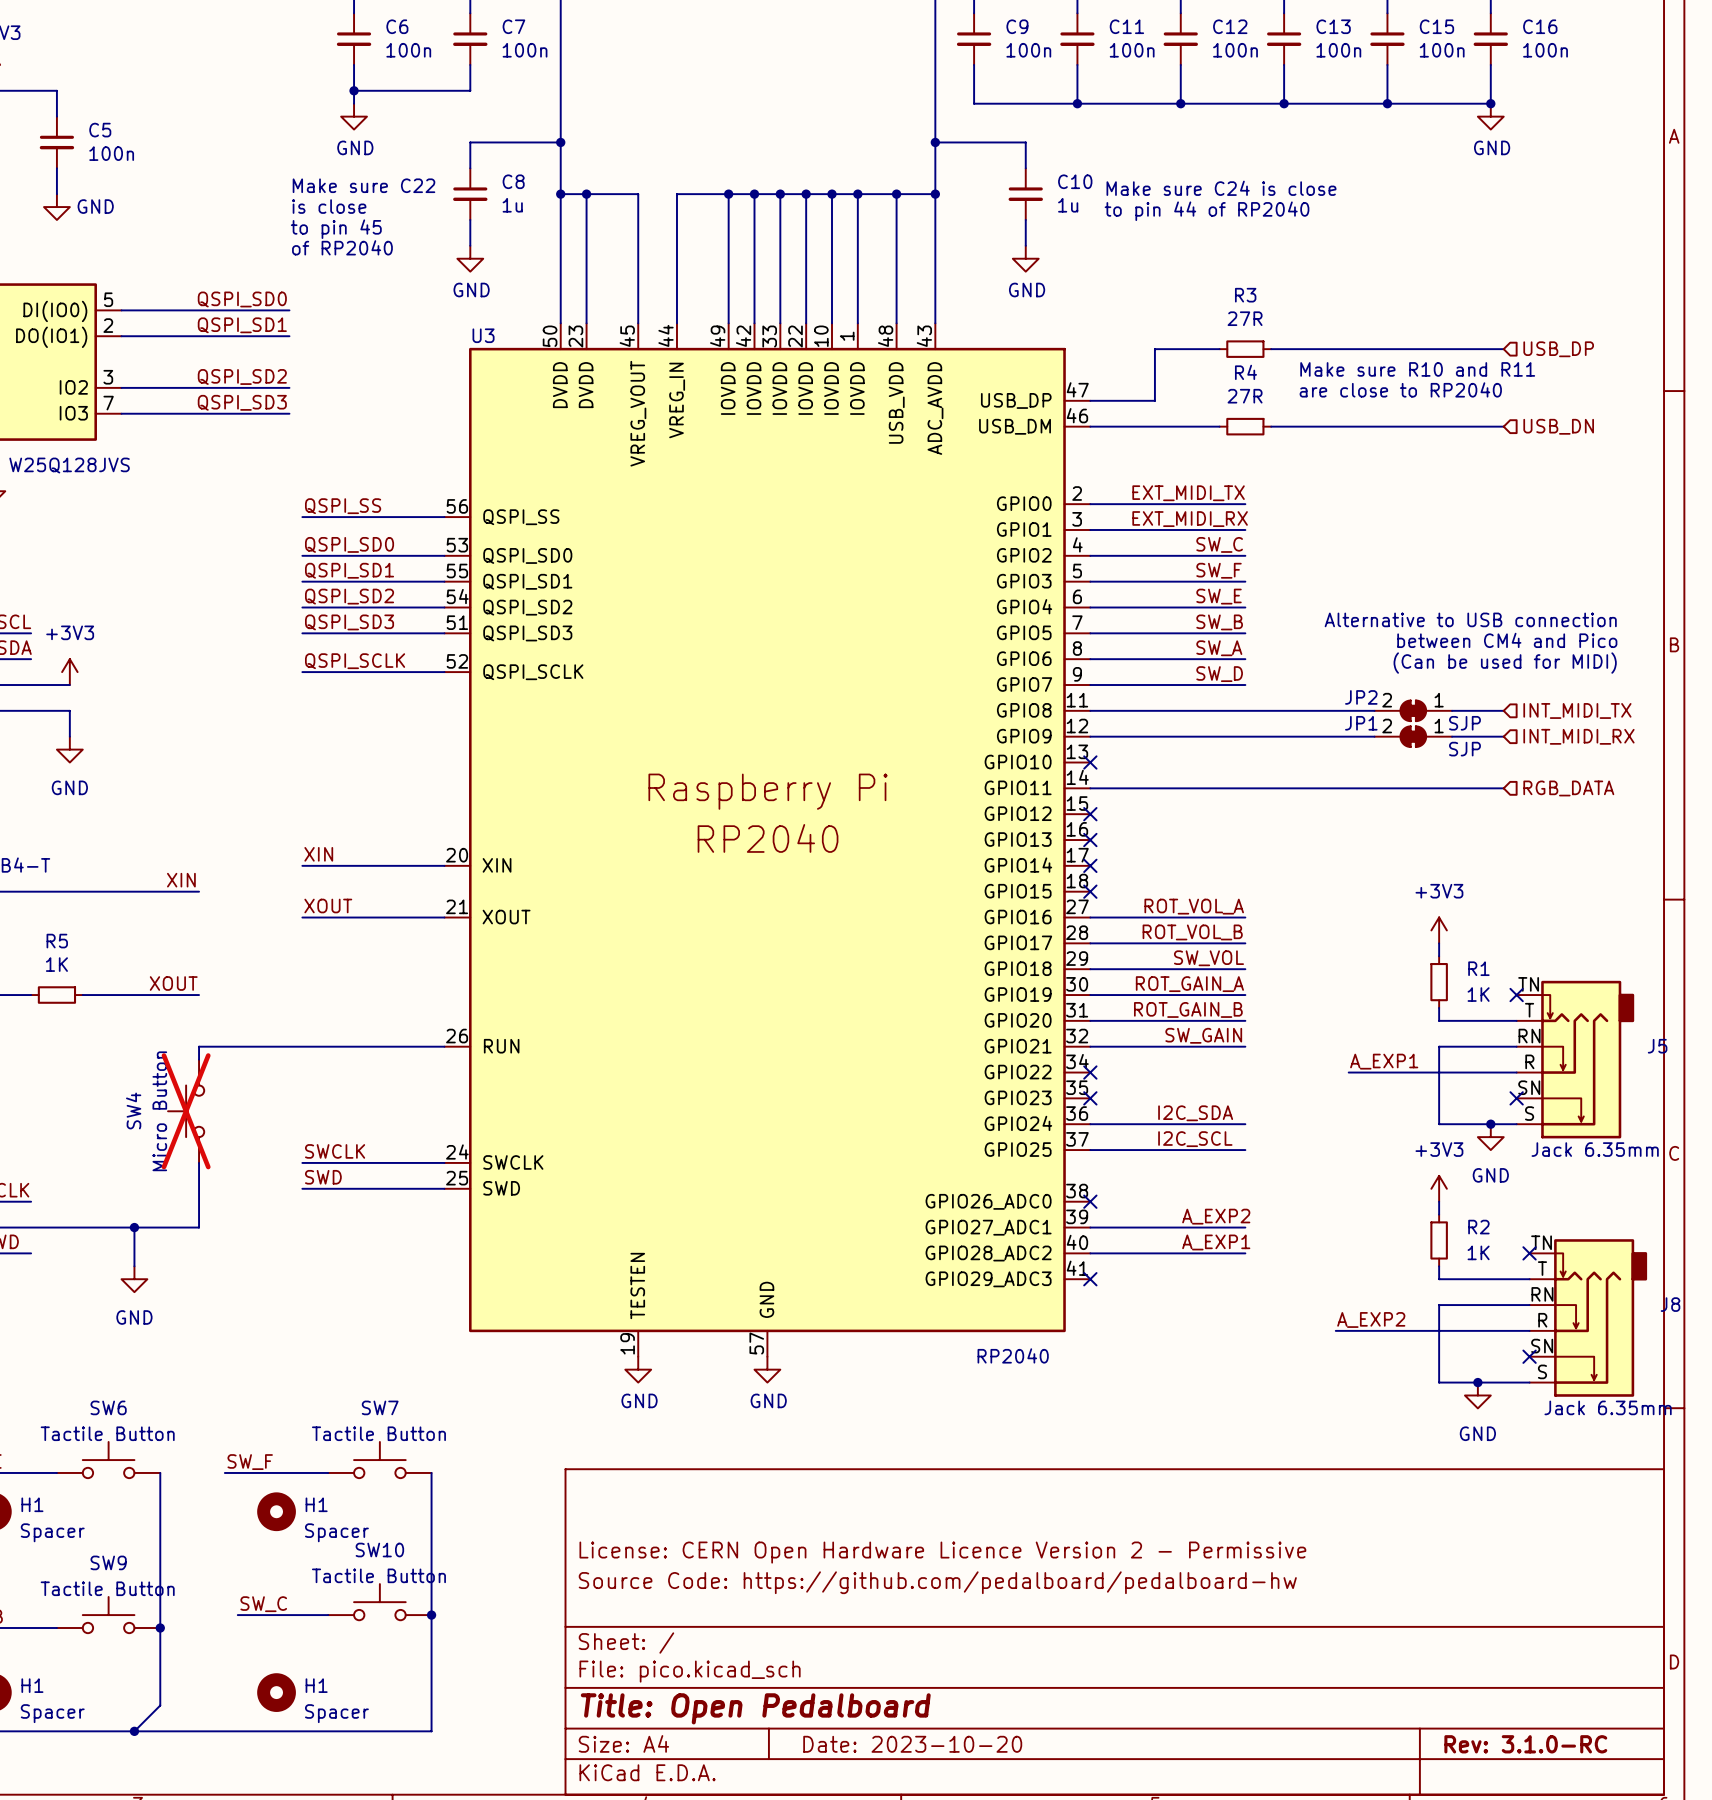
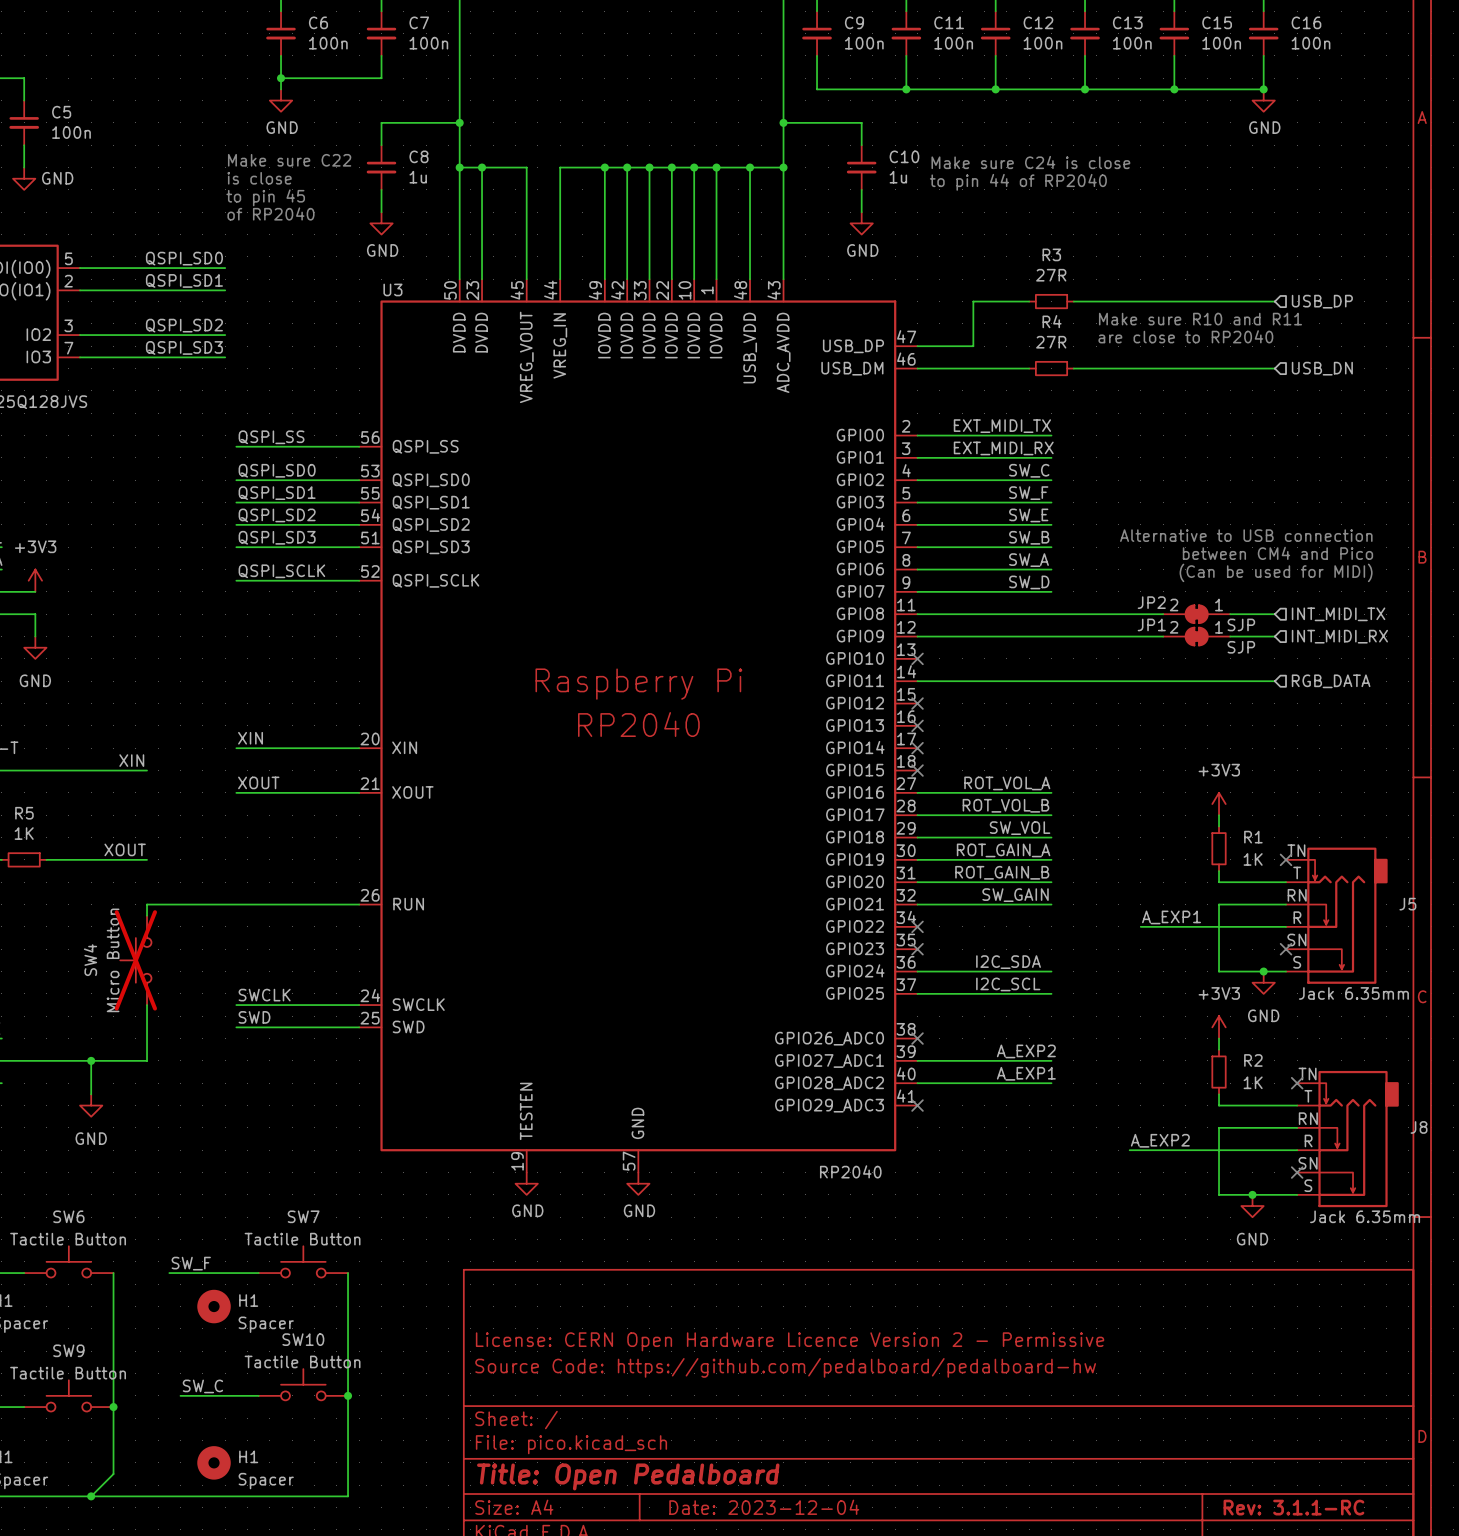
title block: Date: 2023-10-20 (912, 1744) -> Date: 2023-12-04 (764, 1507)
title block: Rev: 3.1.0-RC (1525, 1744) -> Rev: 3.1.1-RC (1293, 1507)

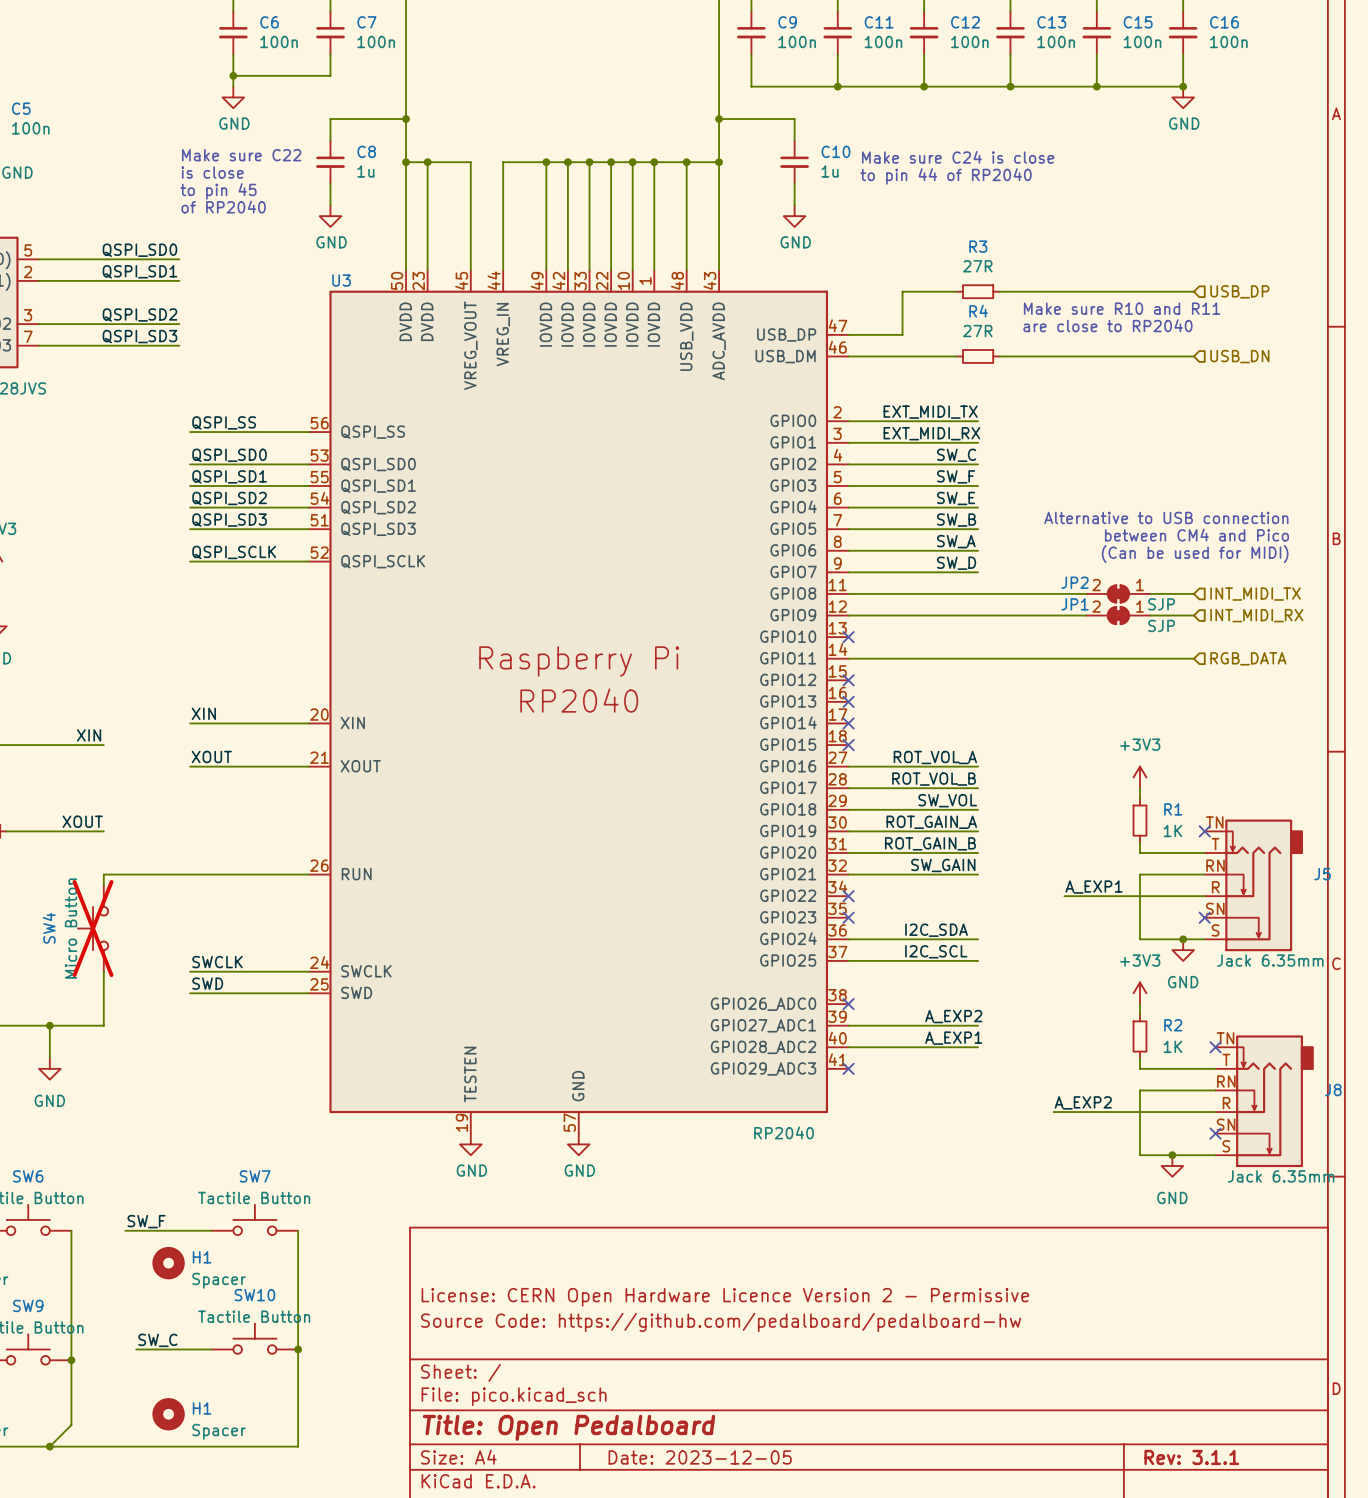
title block: Date: 2023-12-04 (764, 1507) -> Date: 2023-12-05 (700, 1457)
title block: Rev: 3.1.1-RC (1293, 1507) -> Rev: 3.1.1 (1191, 1457)

